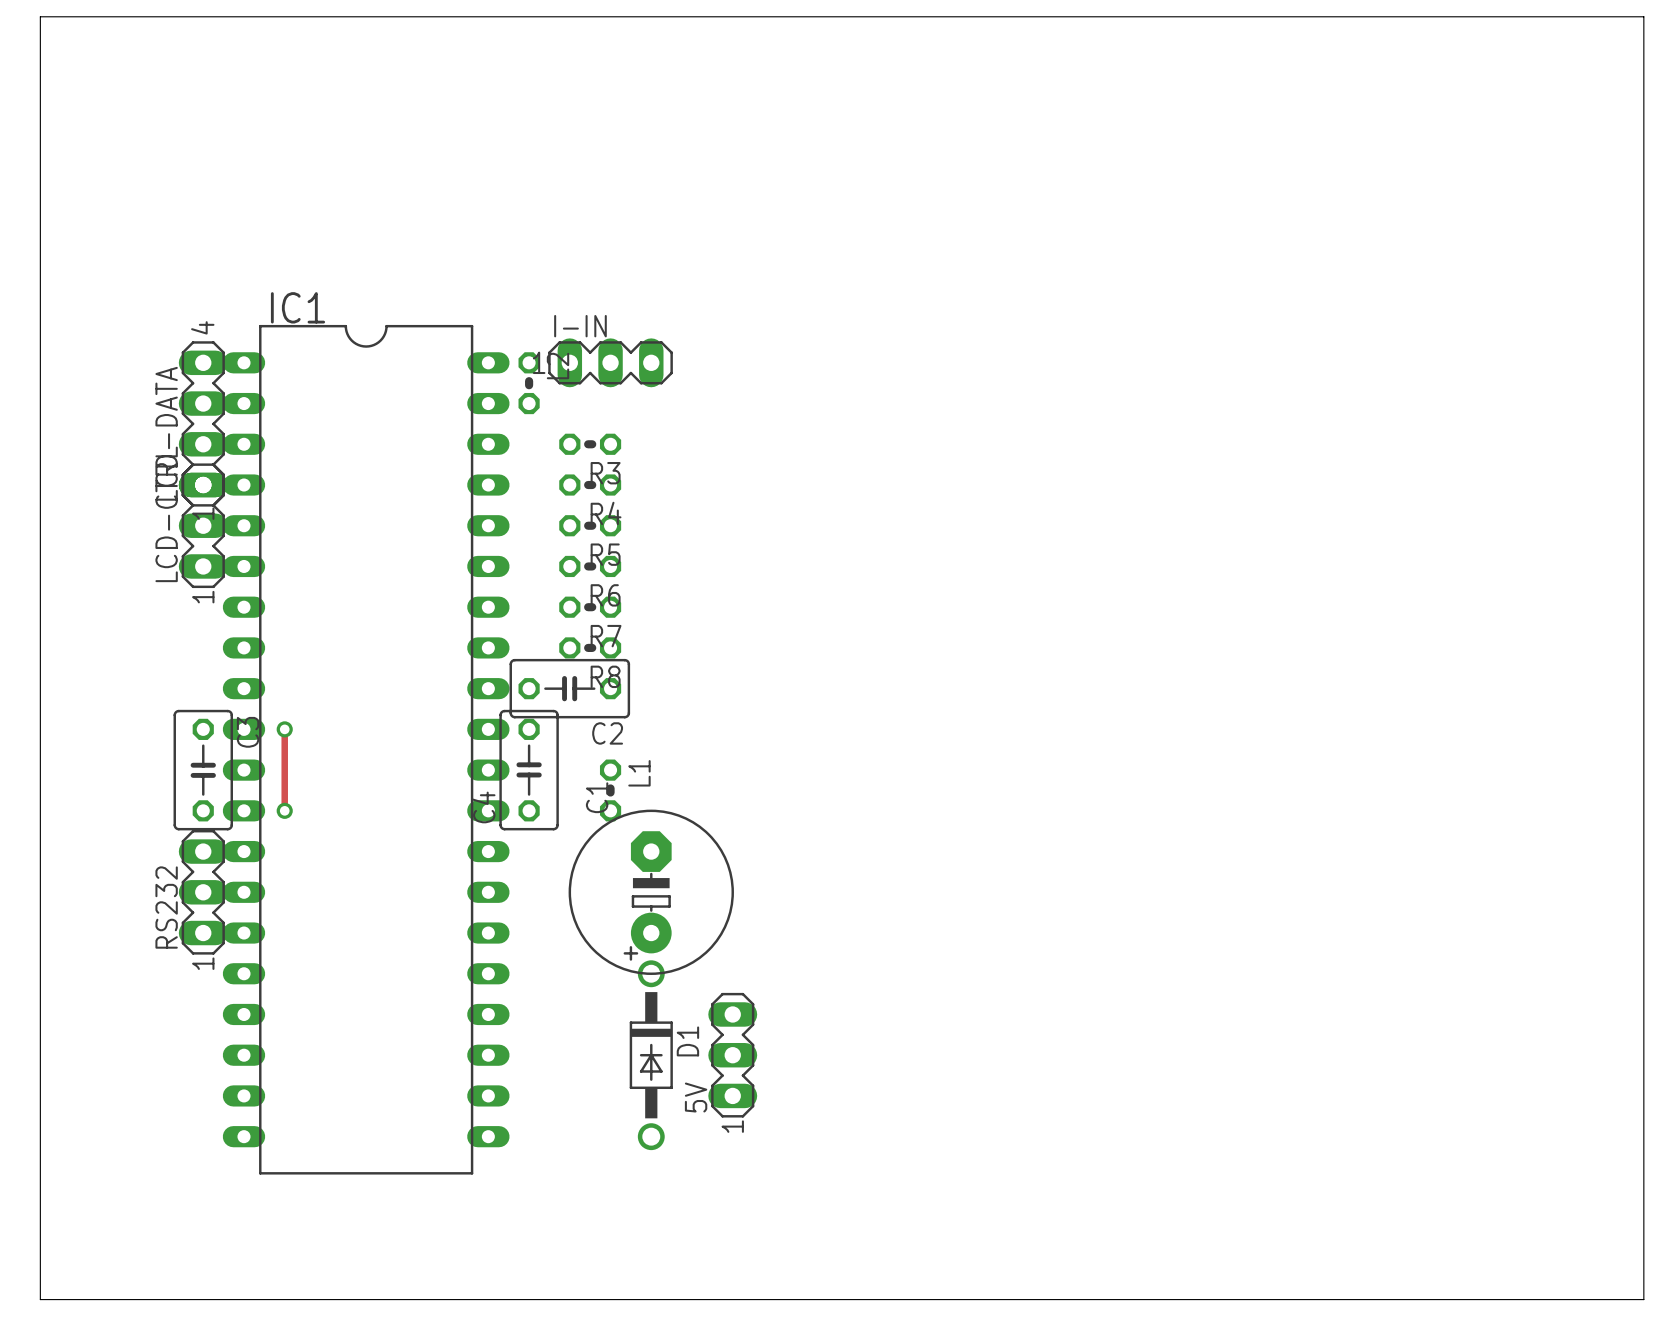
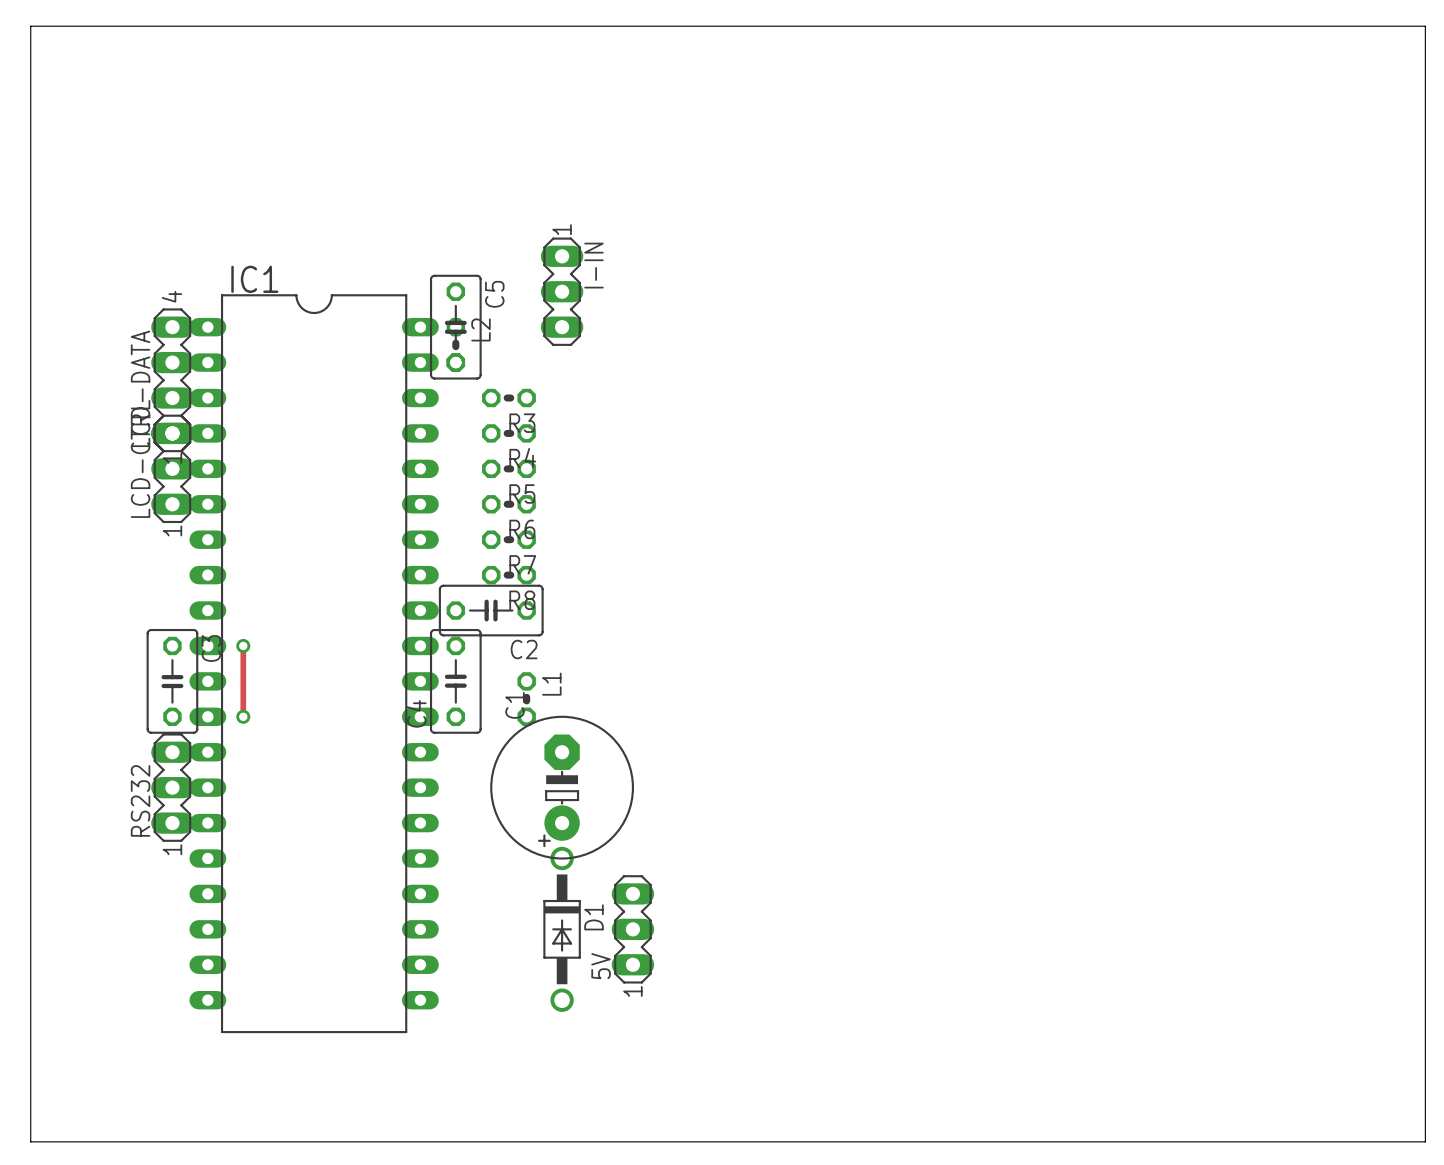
I-IN: none -> (562, 291)
C5: none -> (455, 327)
I-IN: (610, 362) -> none

